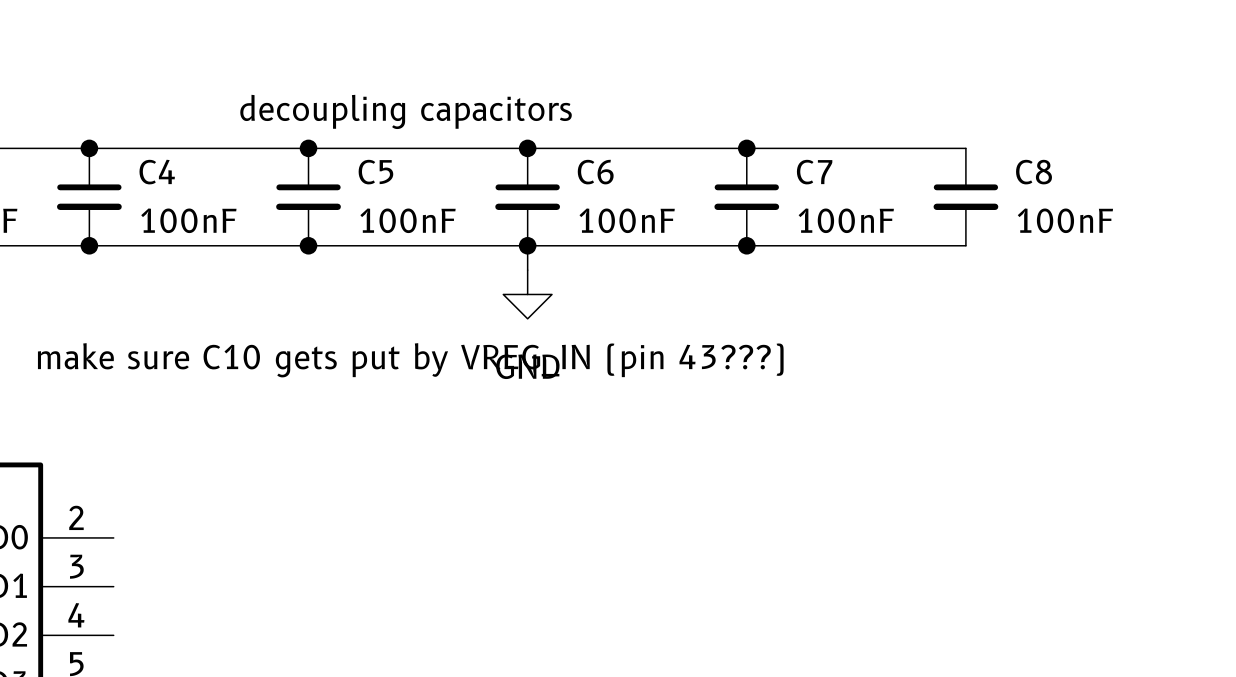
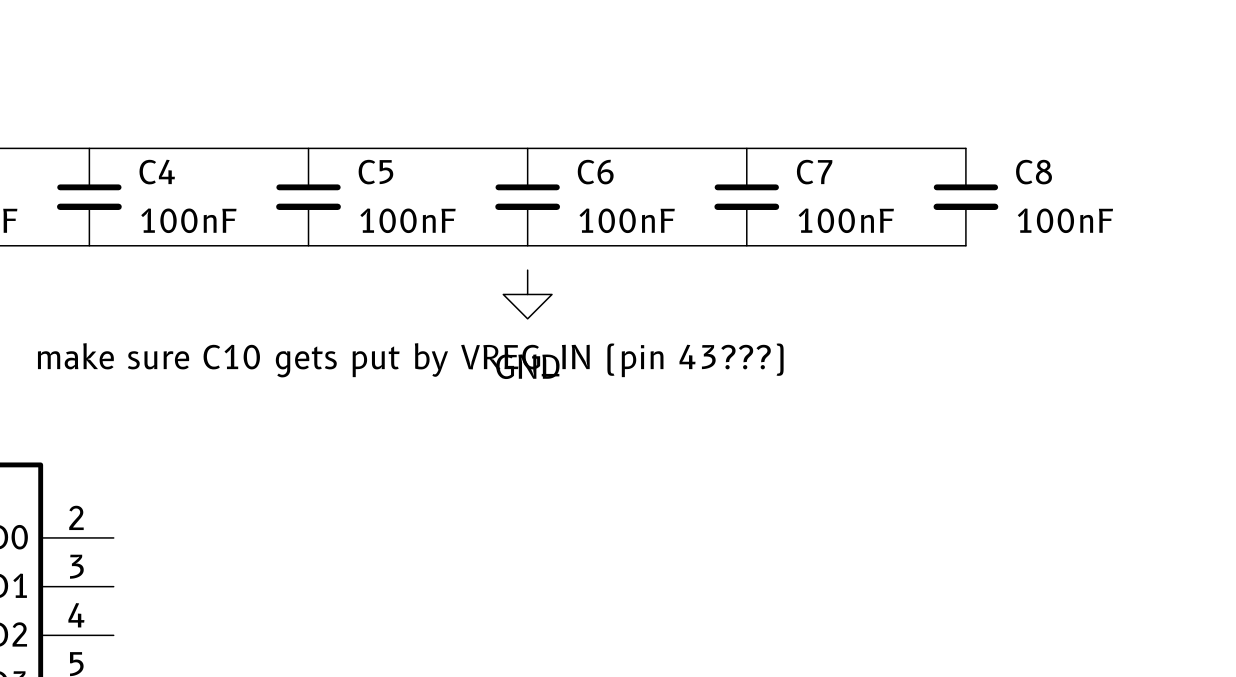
text: decoupling capacitors (406, 111) -> none
junction: (89, 148) -> none
junction: (308, 148) -> none
junction: (527, 148) -> none
junction: (746, 148) -> none
junction: (89, 245) -> none
junction: (308, 245) -> none
wire: (527, 245) (527, 270) -> none
junction: (527, 245) -> none
junction: (746, 245) -> none

